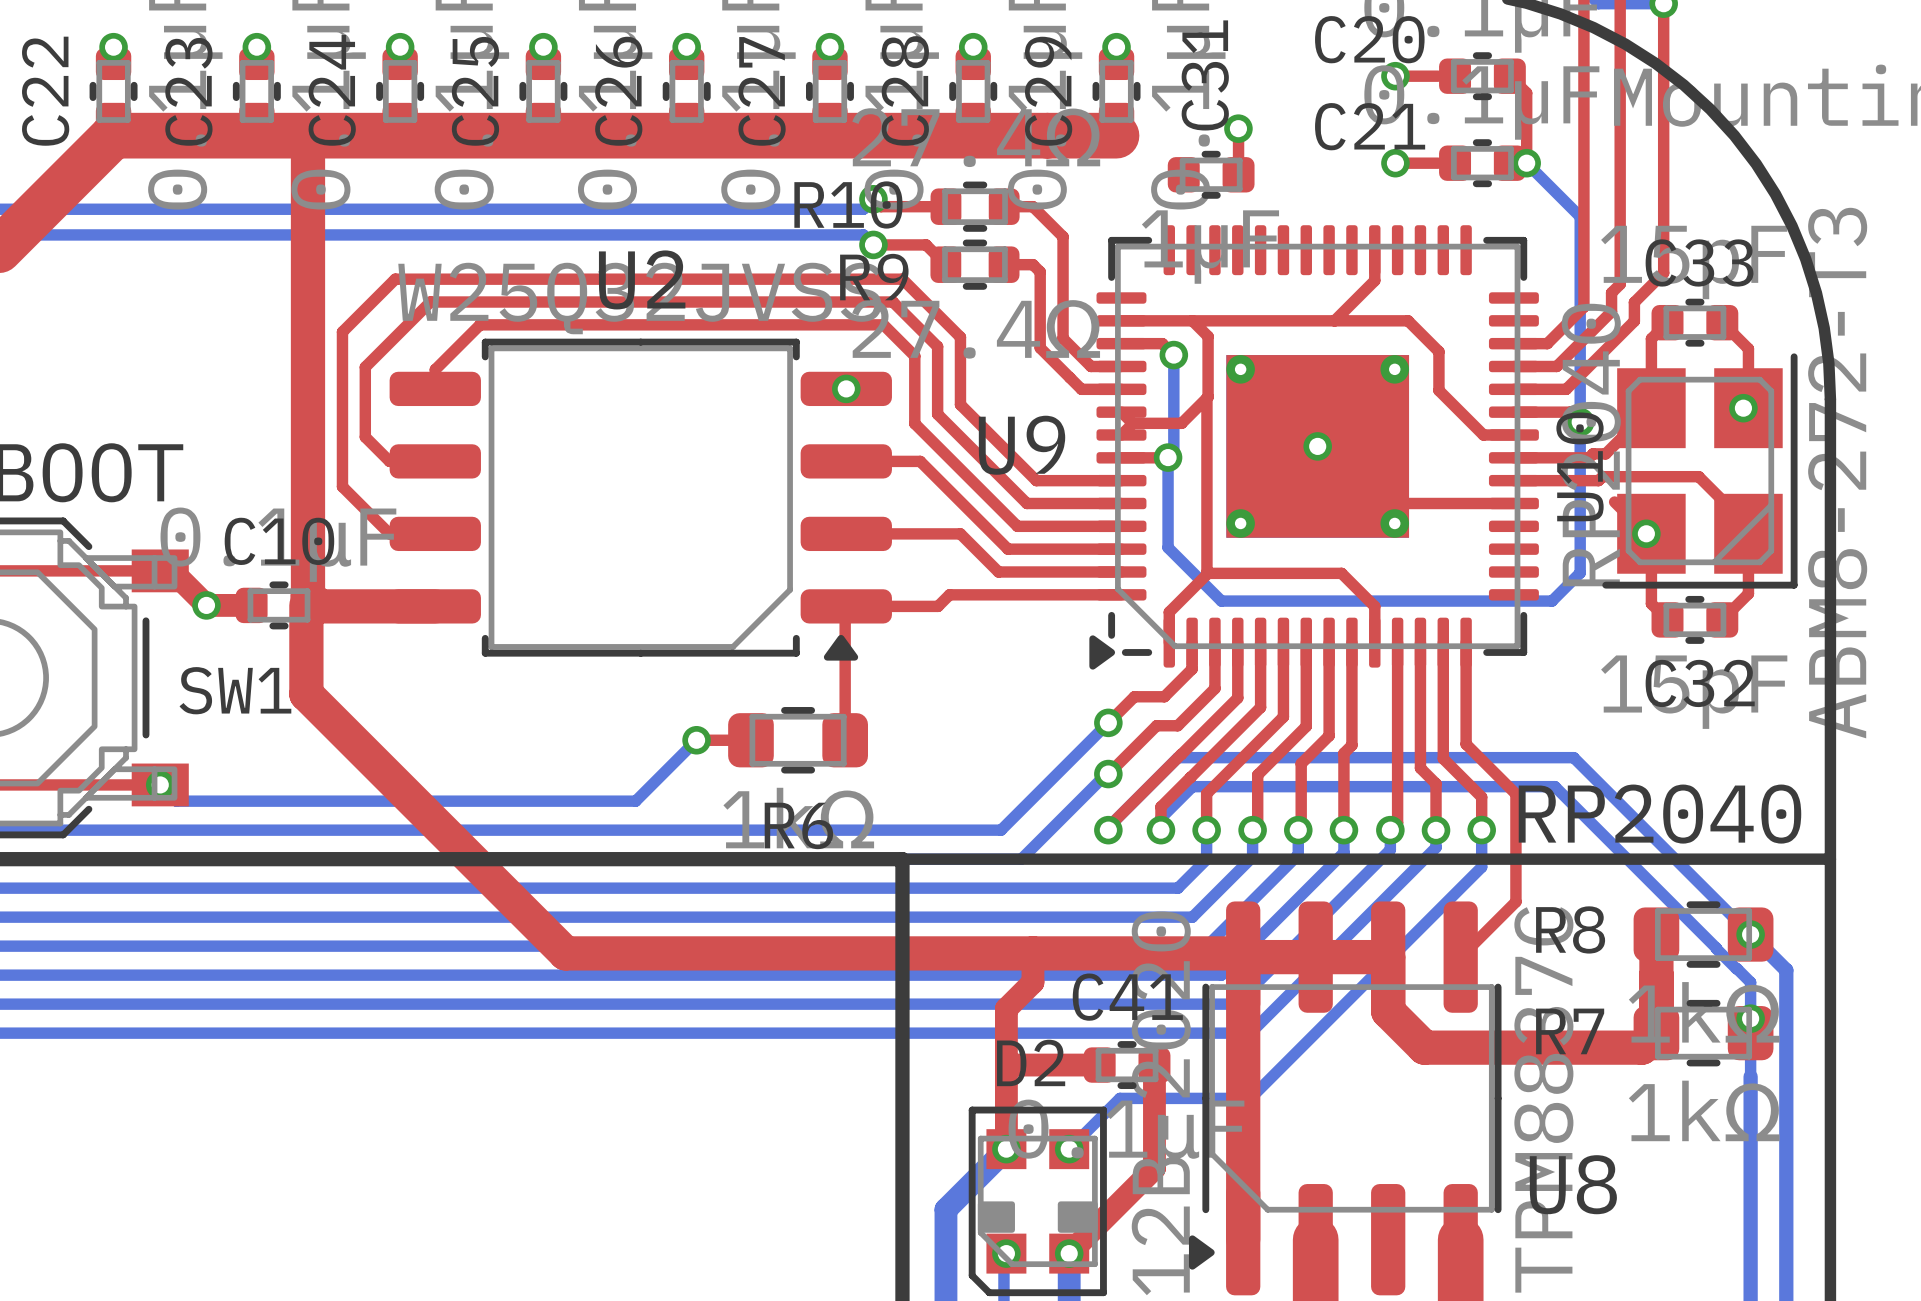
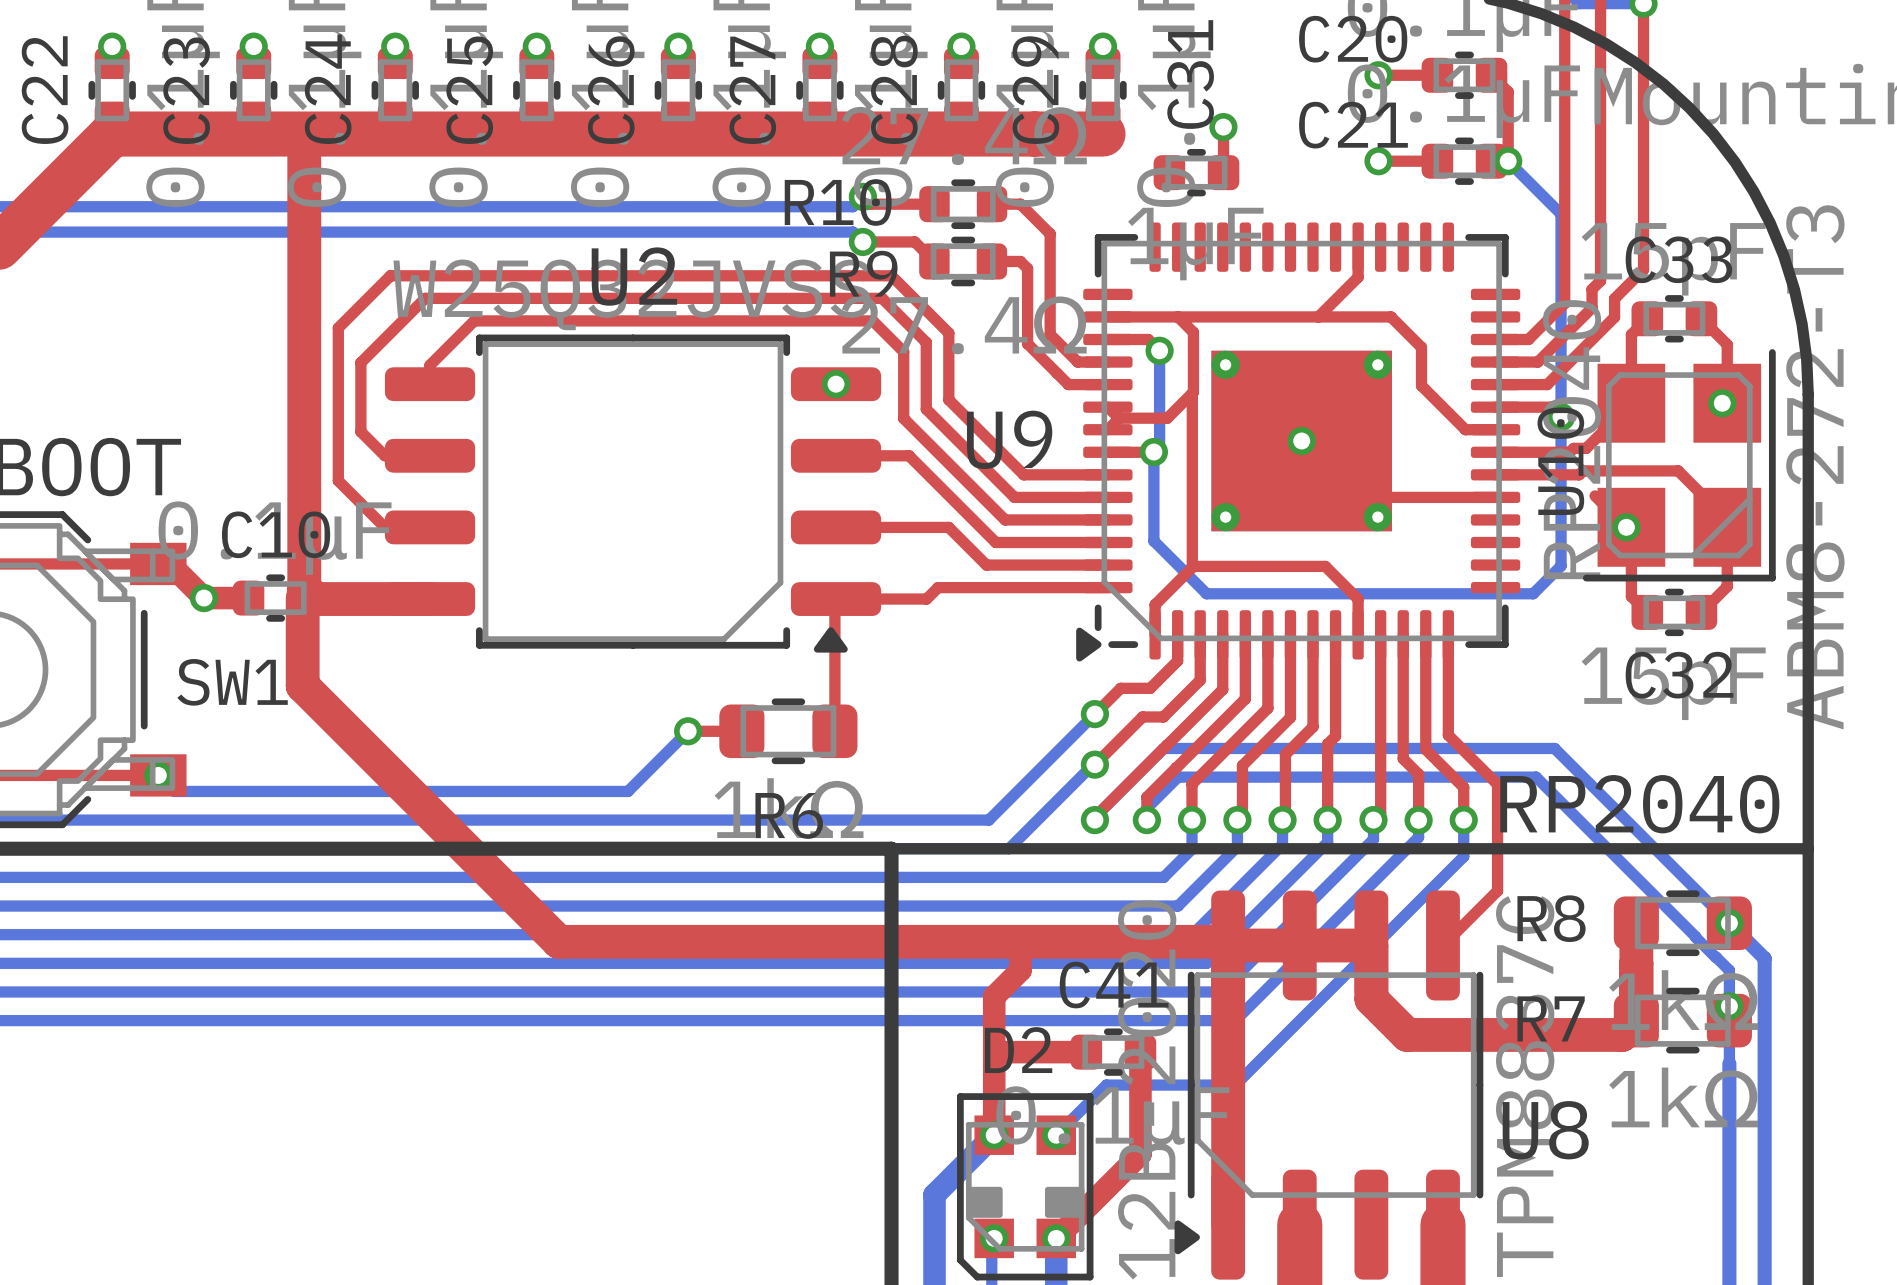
U8 name position: U8 (1573, 1184) -> U8 (1545, 1130)

